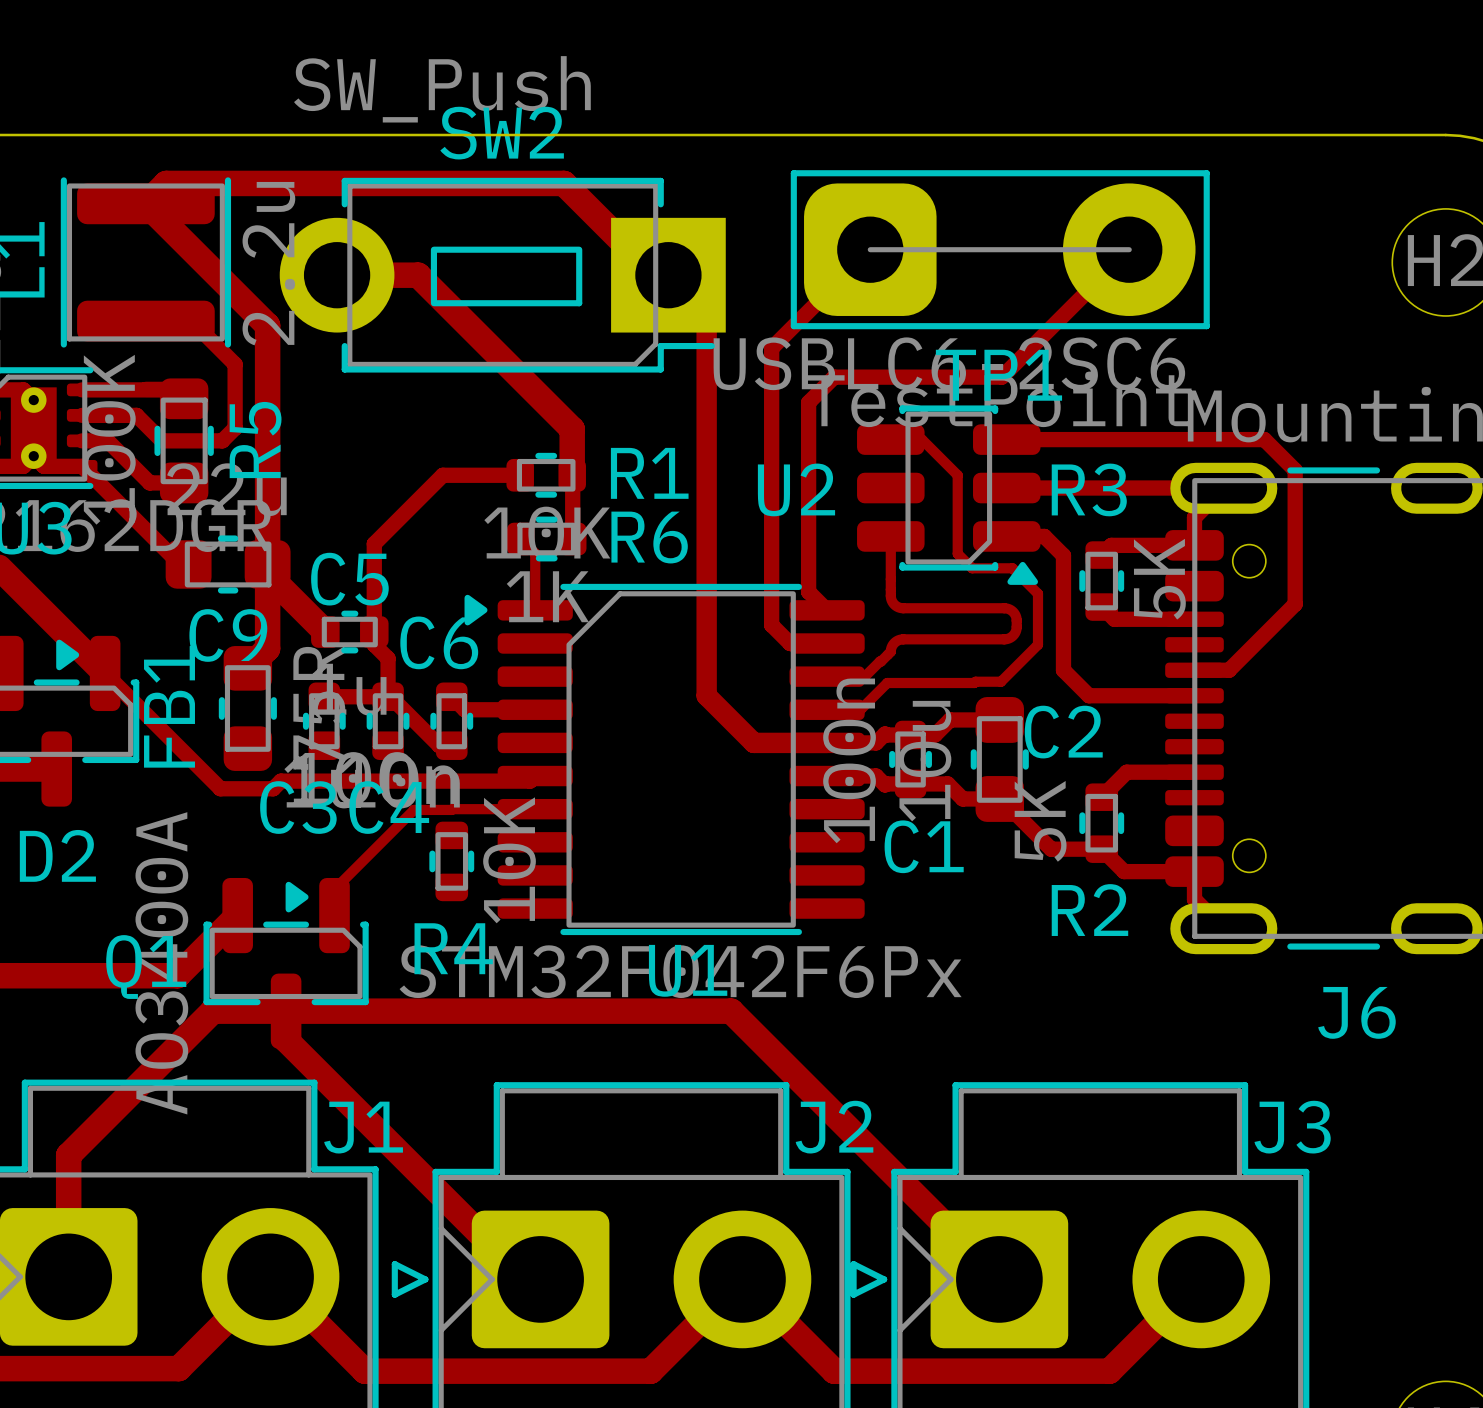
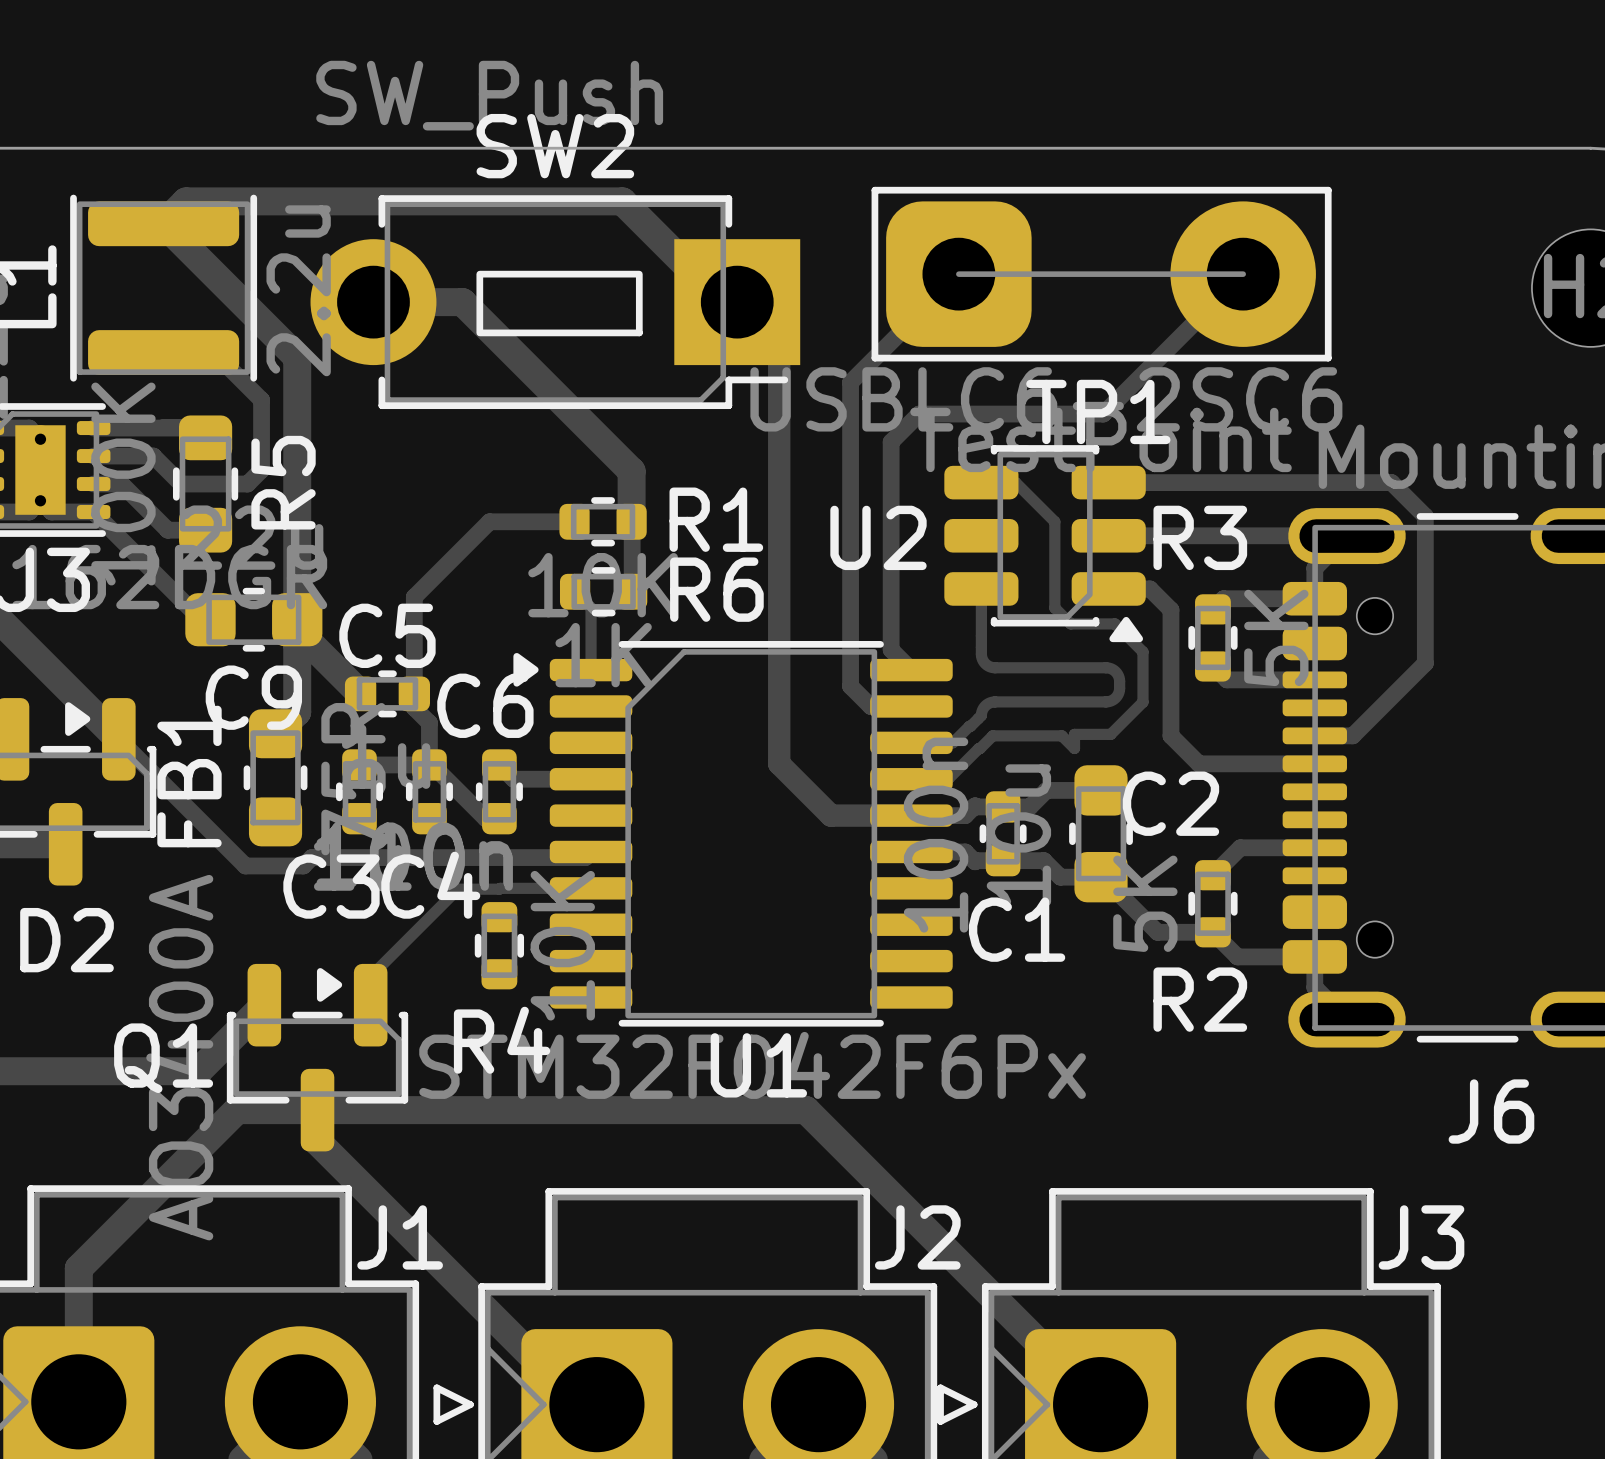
track: (1038, 639) (1038, 644) (1001, 681) (887, 683) -> (1143, 702) (1110, 734) (1074, 734) (1074, 748) (1061, 735) (992, 735) (977, 749)

